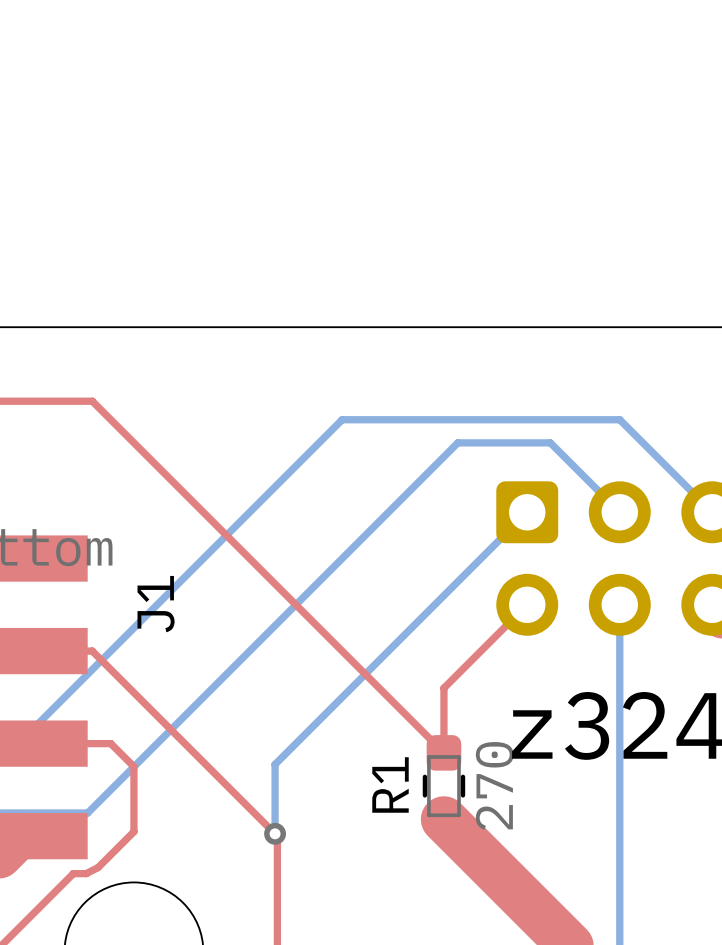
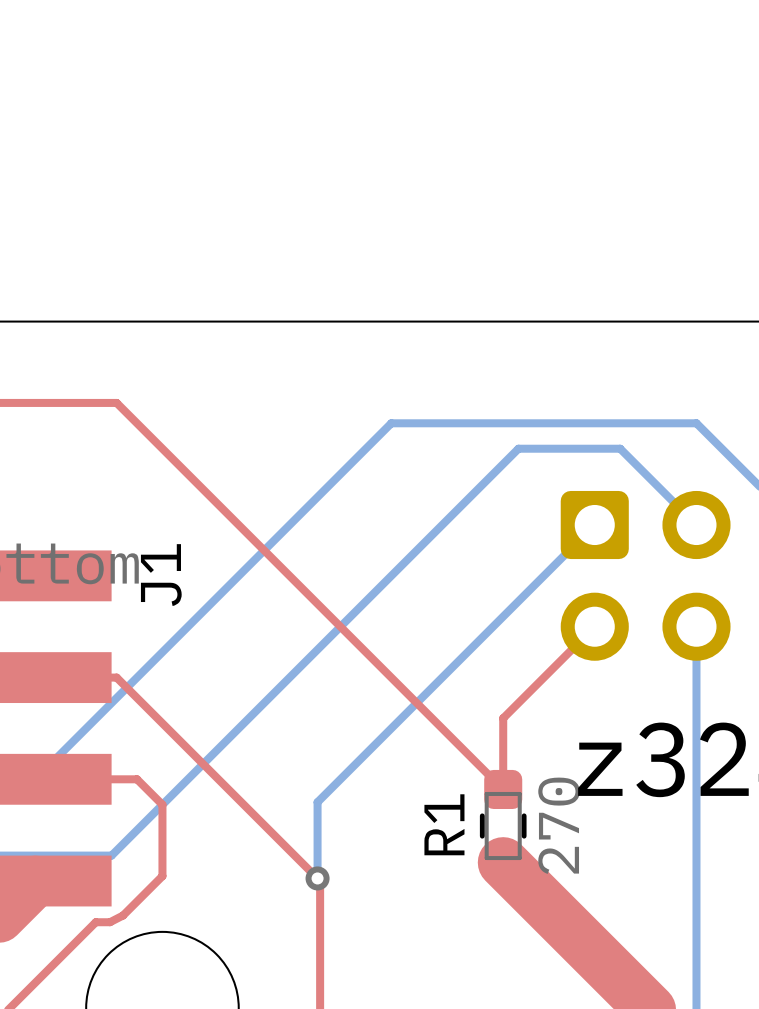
J1 name position: J1 (156, 604) -> J1 (161, 575)

